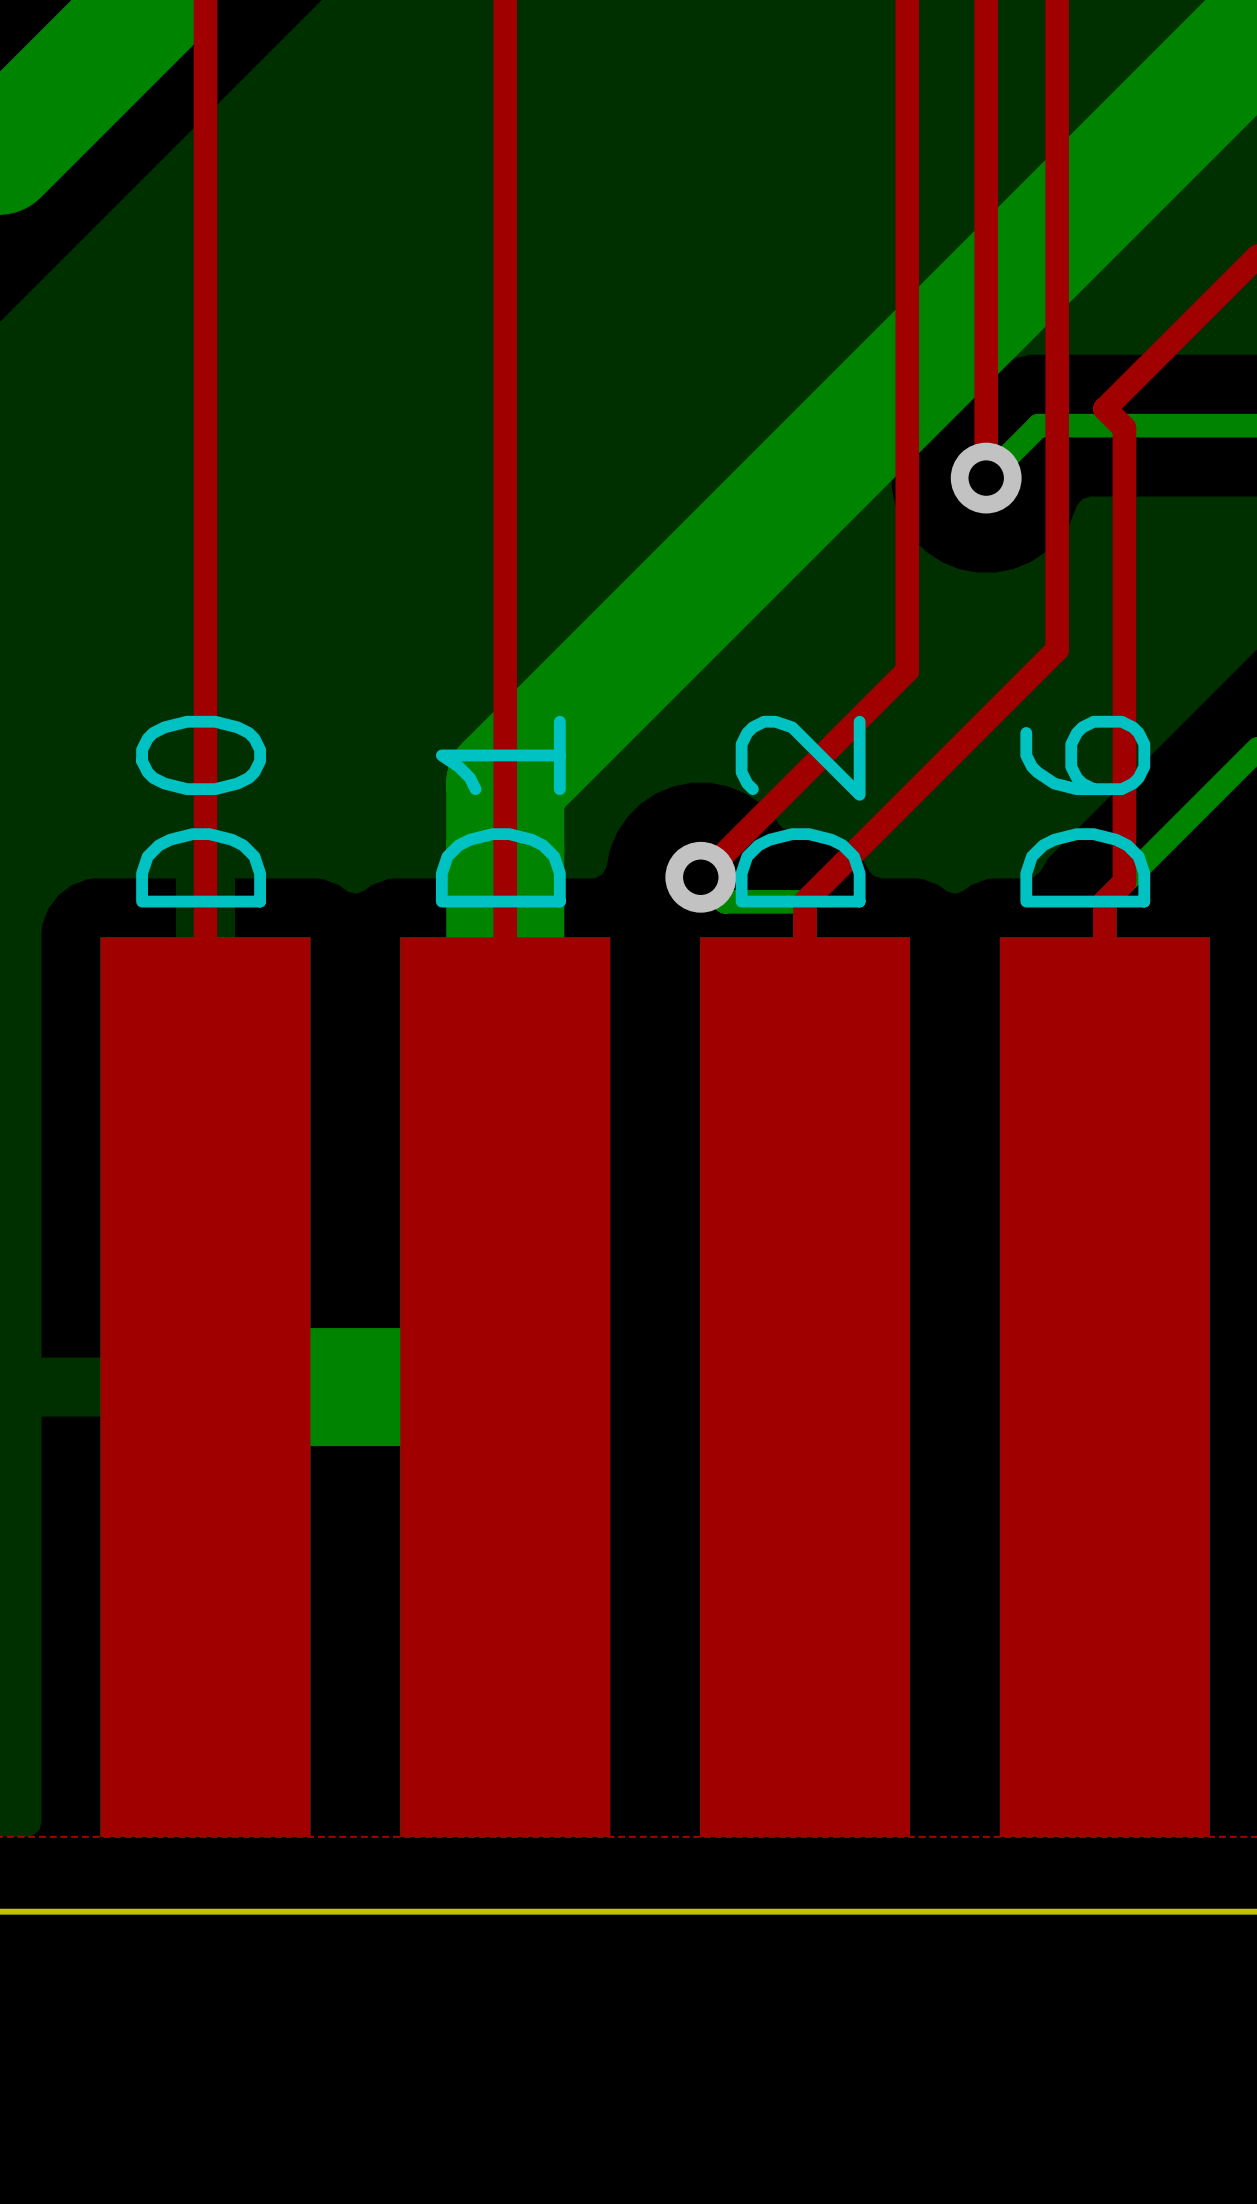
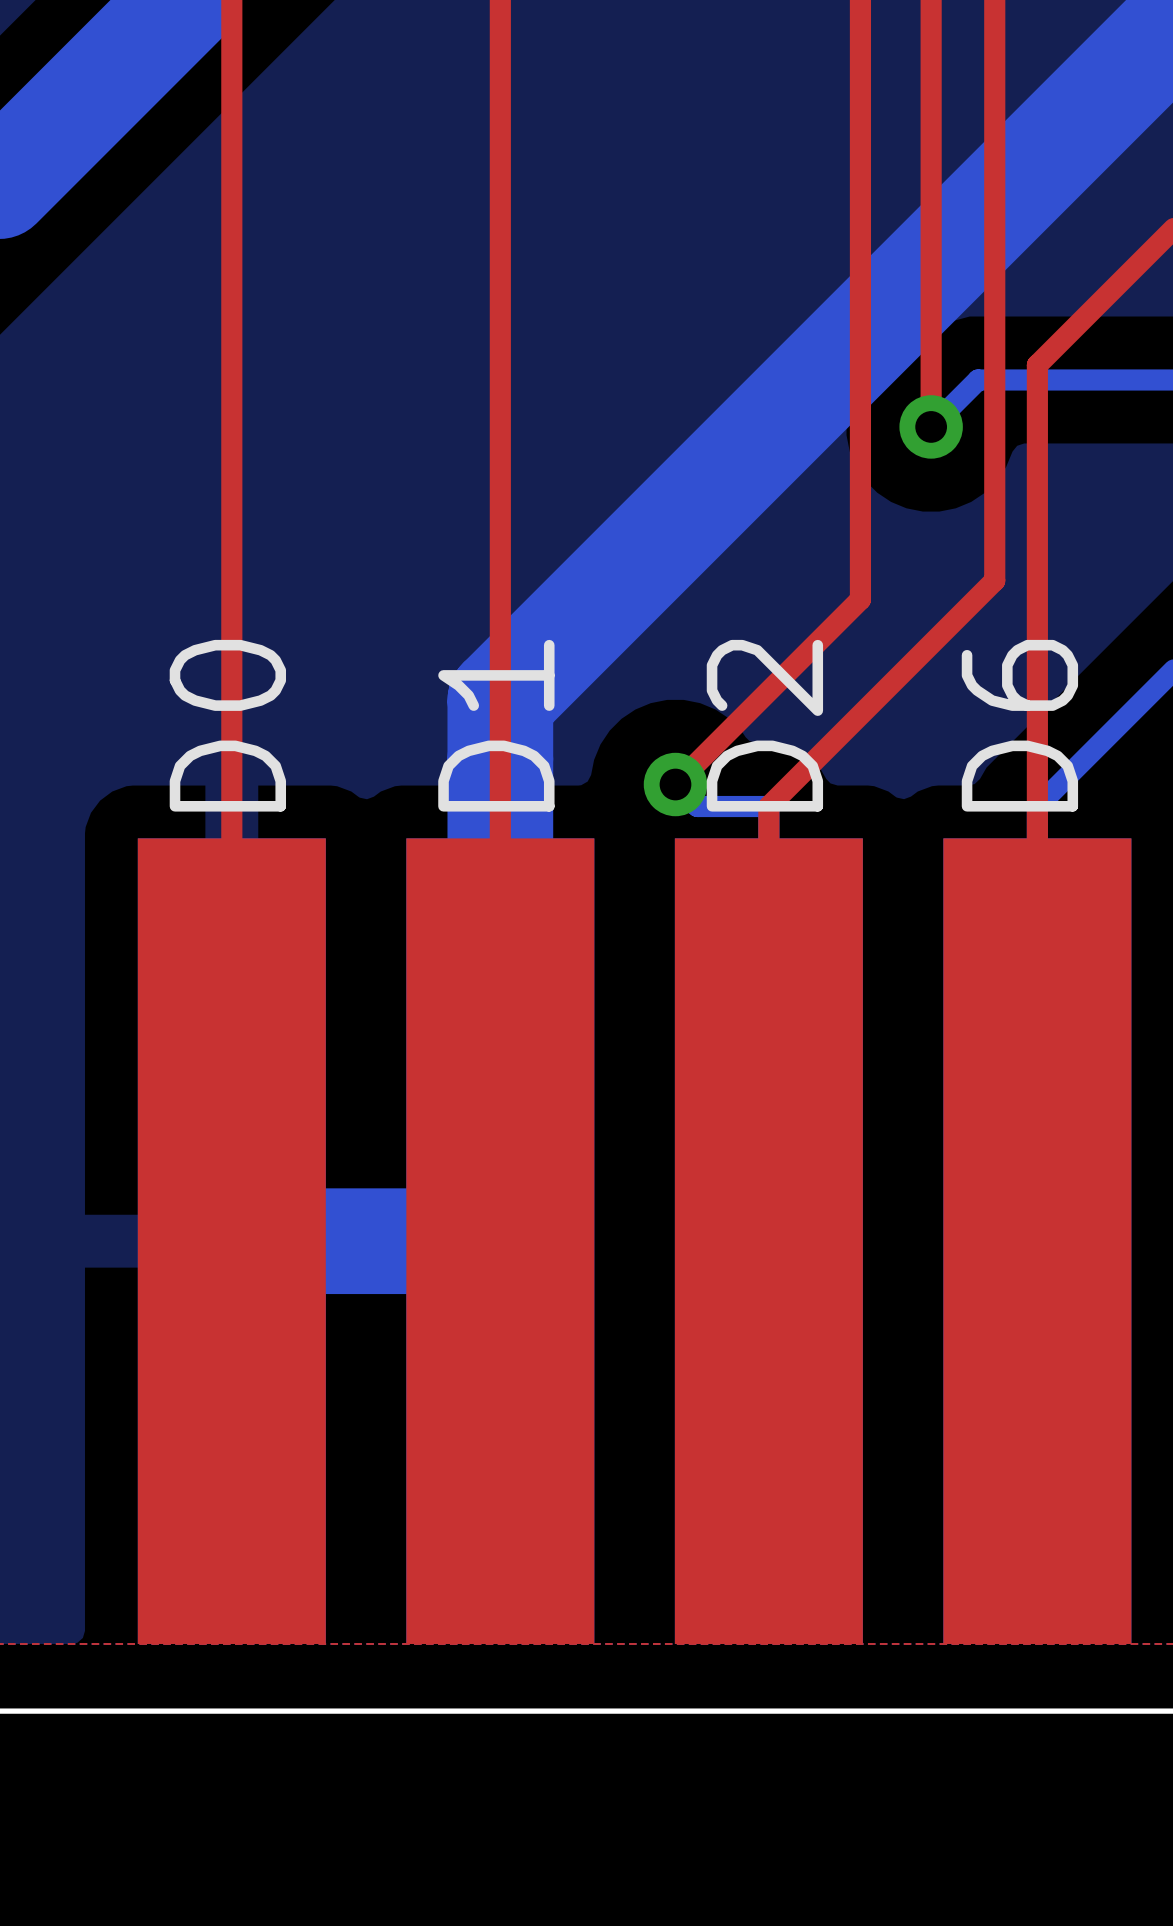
top track: (1104, 408) (1124, 428) (1124, 882) (1104, 901) -> (1037, 365) (1037, 806)

